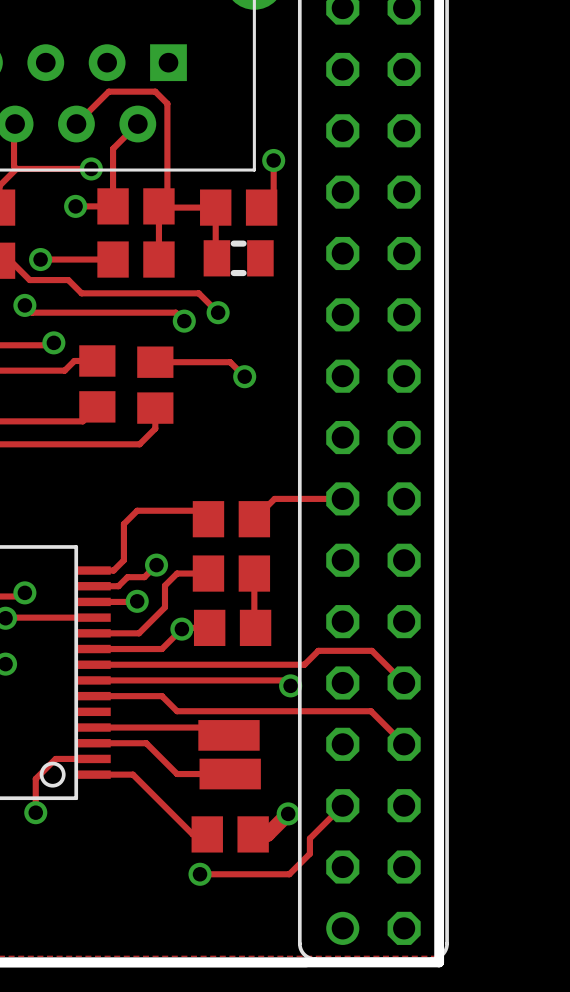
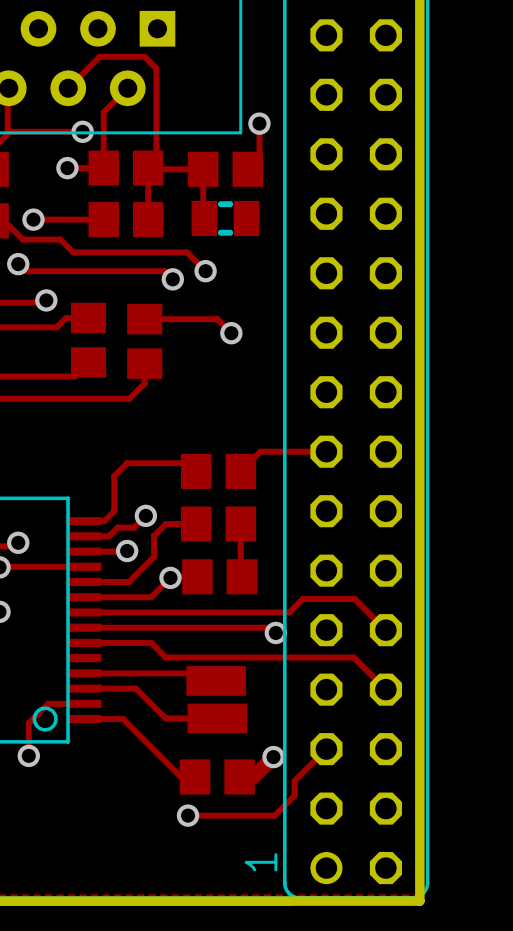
part text: none -> 1 (261, 862)

